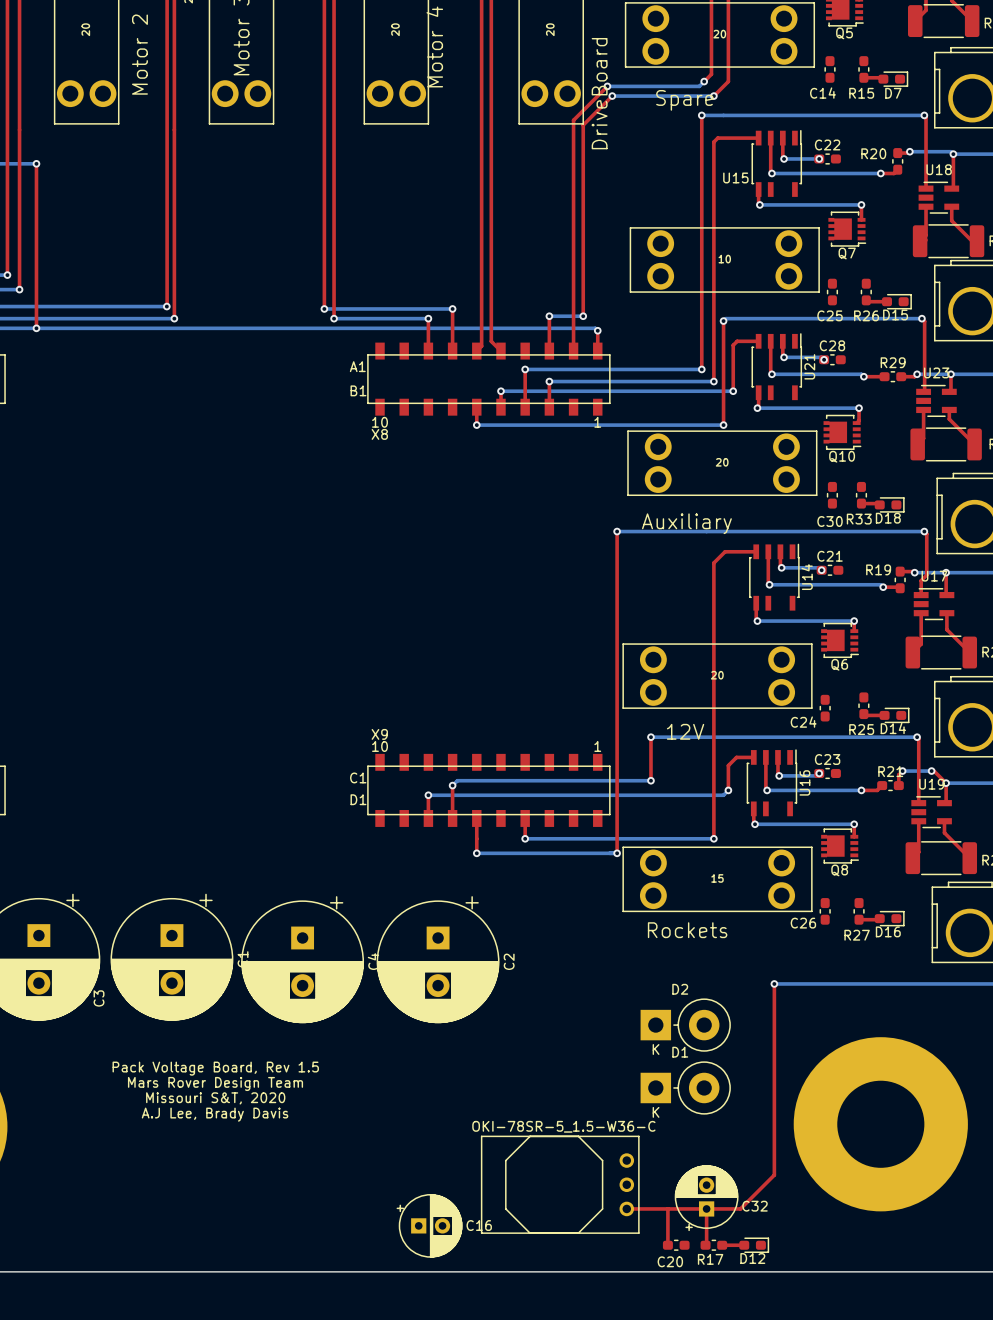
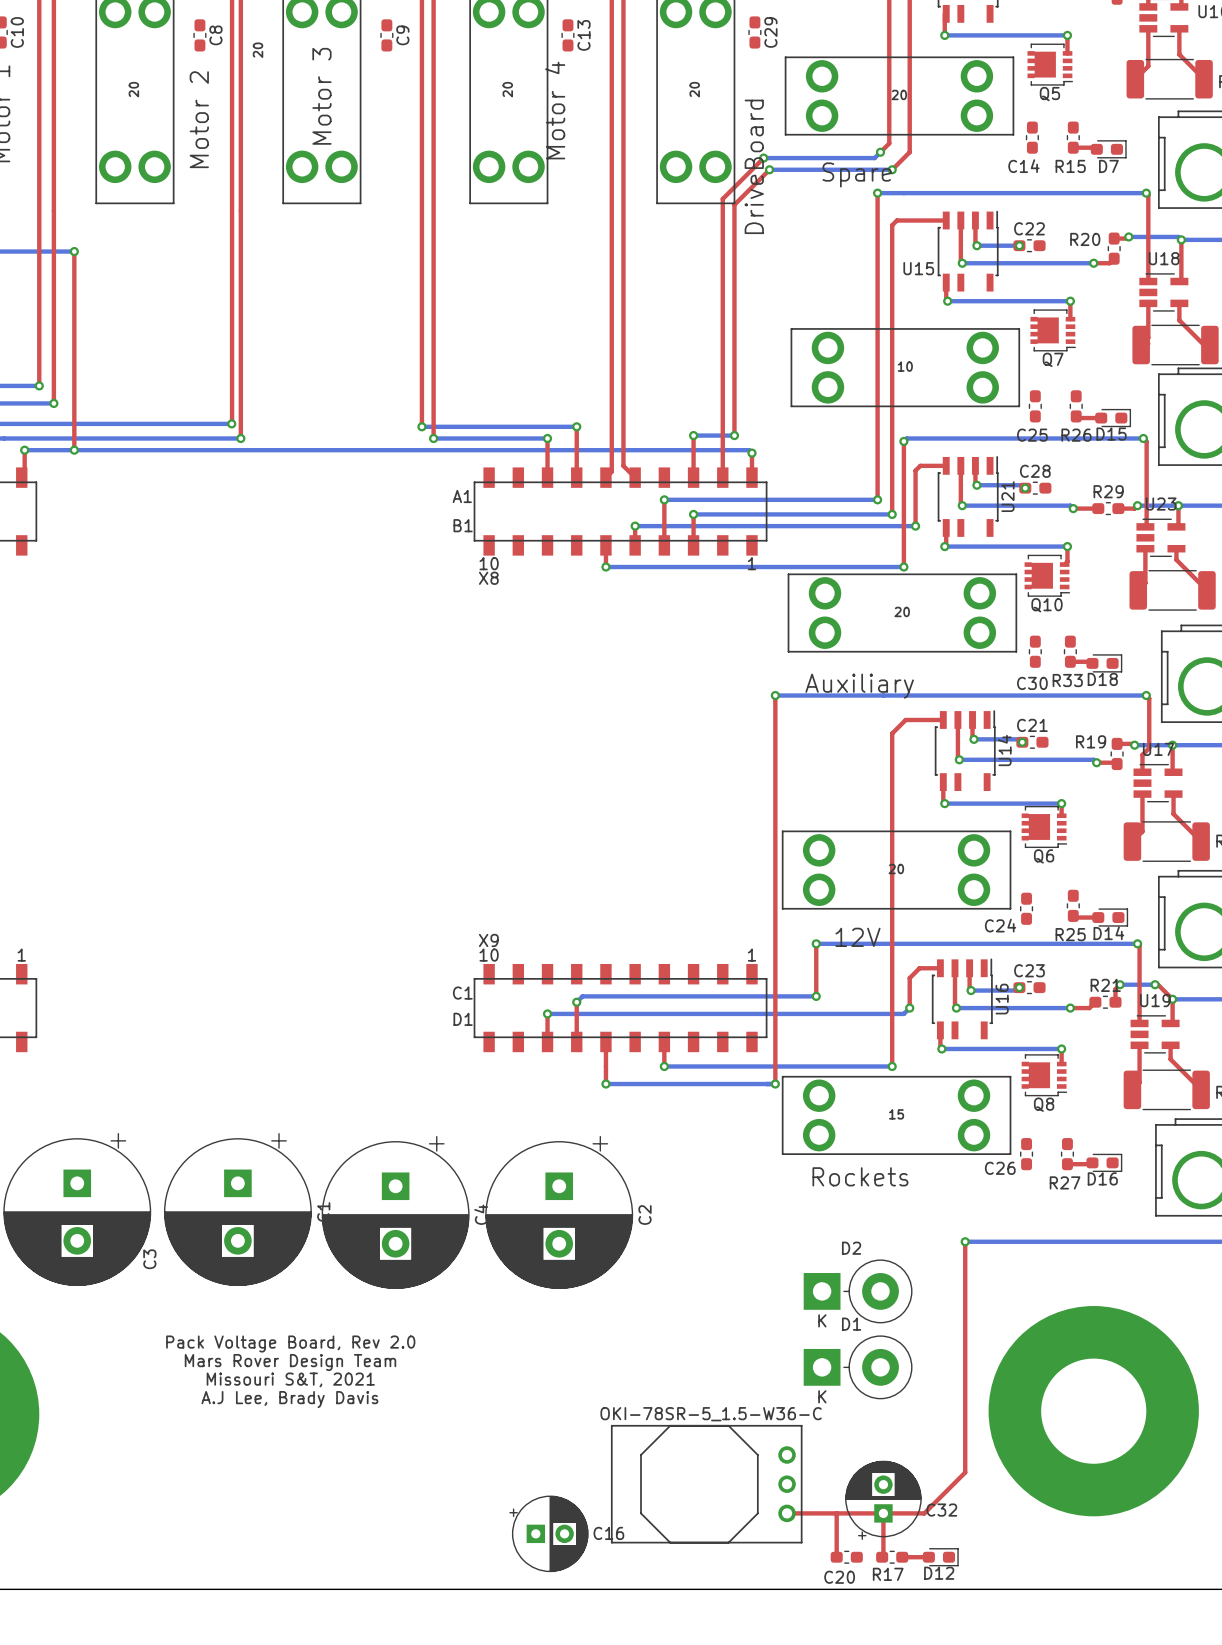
text: Pack Voltage Board, Rev 1.5 (215, 1068) -> Pack Voltage Board, Rev 2.0 (290, 1343)
text: Missouri S&T, 2020 (215, 1098) -> Missouri S&T, 2021 (290, 1379)

